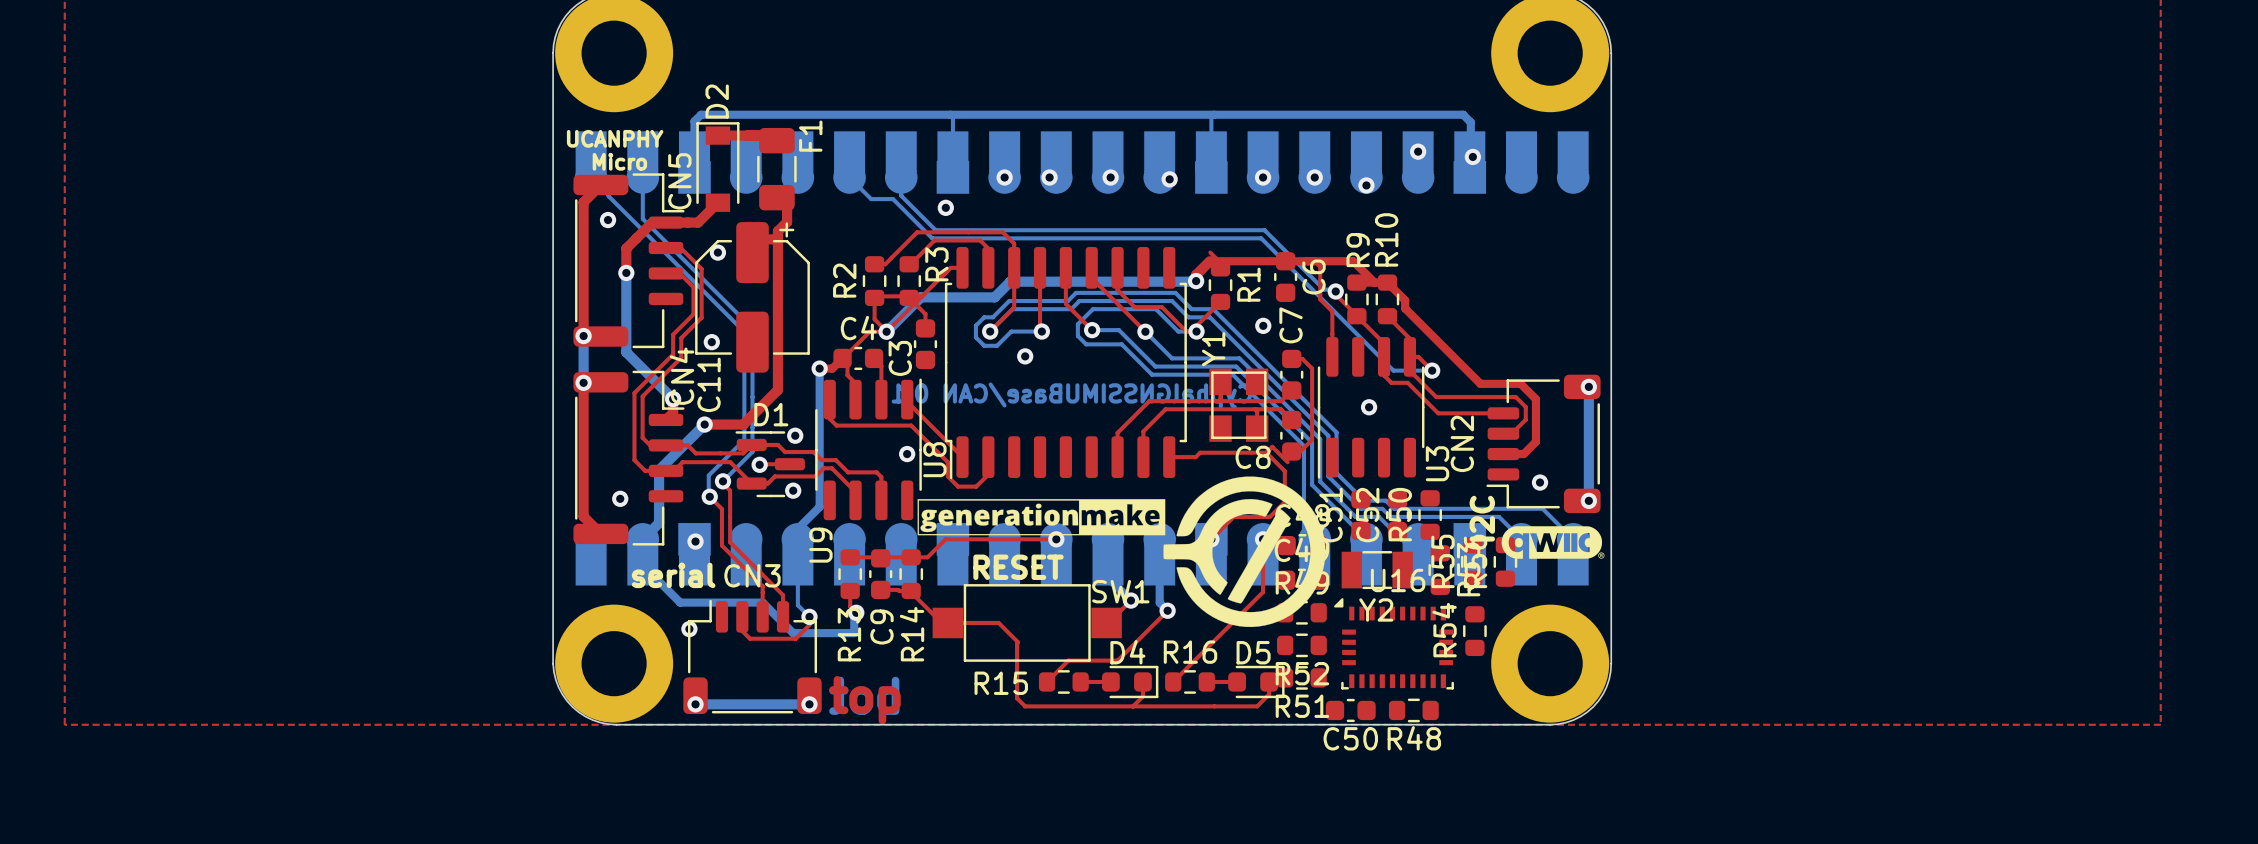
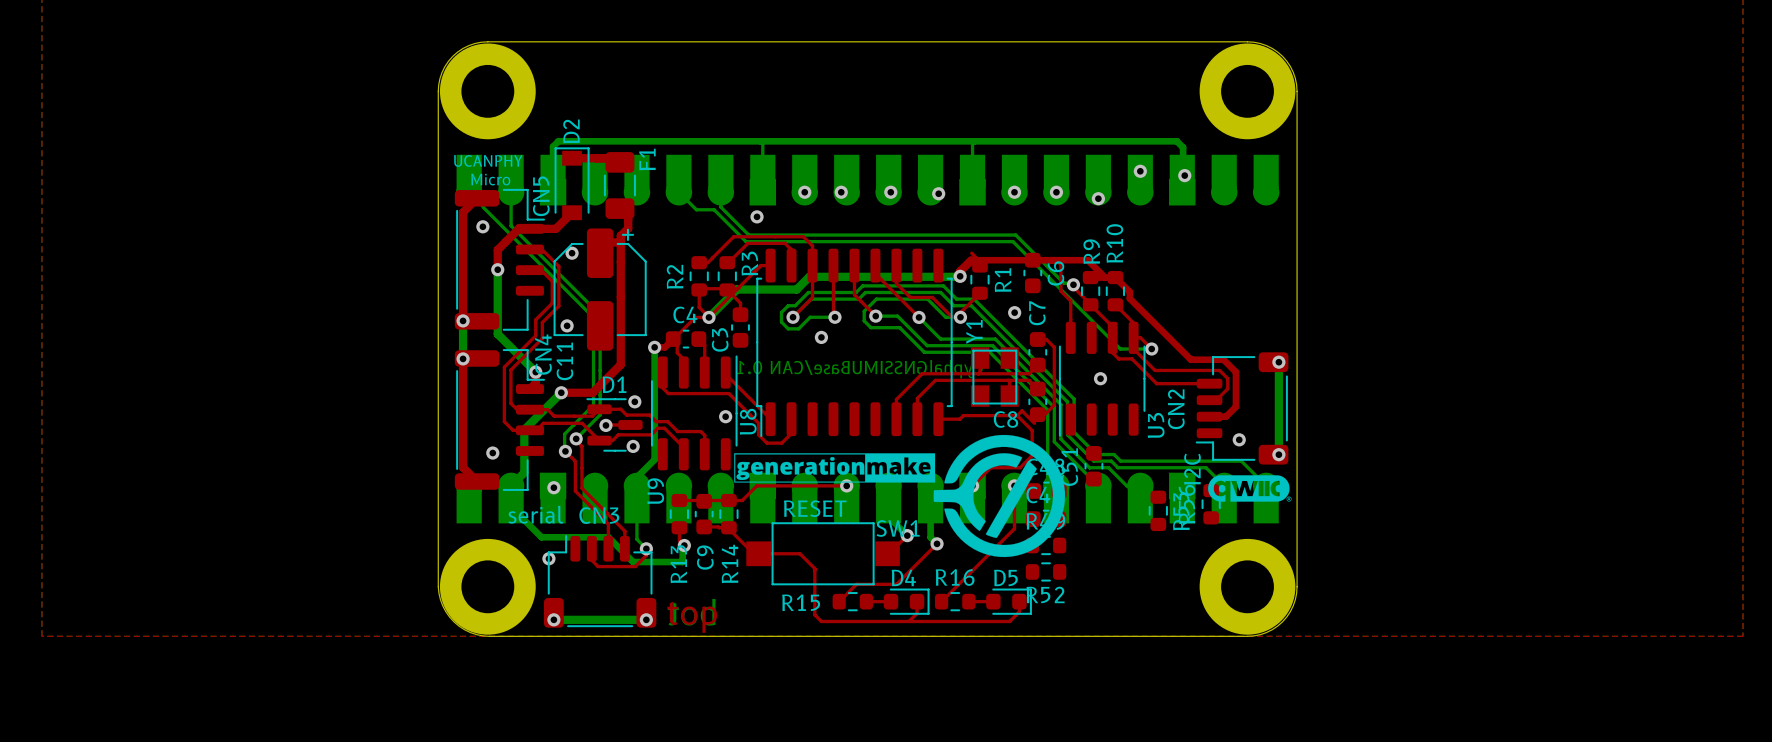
C52: (1397, 515) -> none
R50: (1430, 515) -> none
R55: (1472, 561) -> none
Y2: (1377, 570) -> none
R54: (1474, 631) -> none
U16: (1394, 643) -> none
R51: (1301, 677) -> none
C50: (1350, 710) -> none
R48: (1413, 710) -> none

